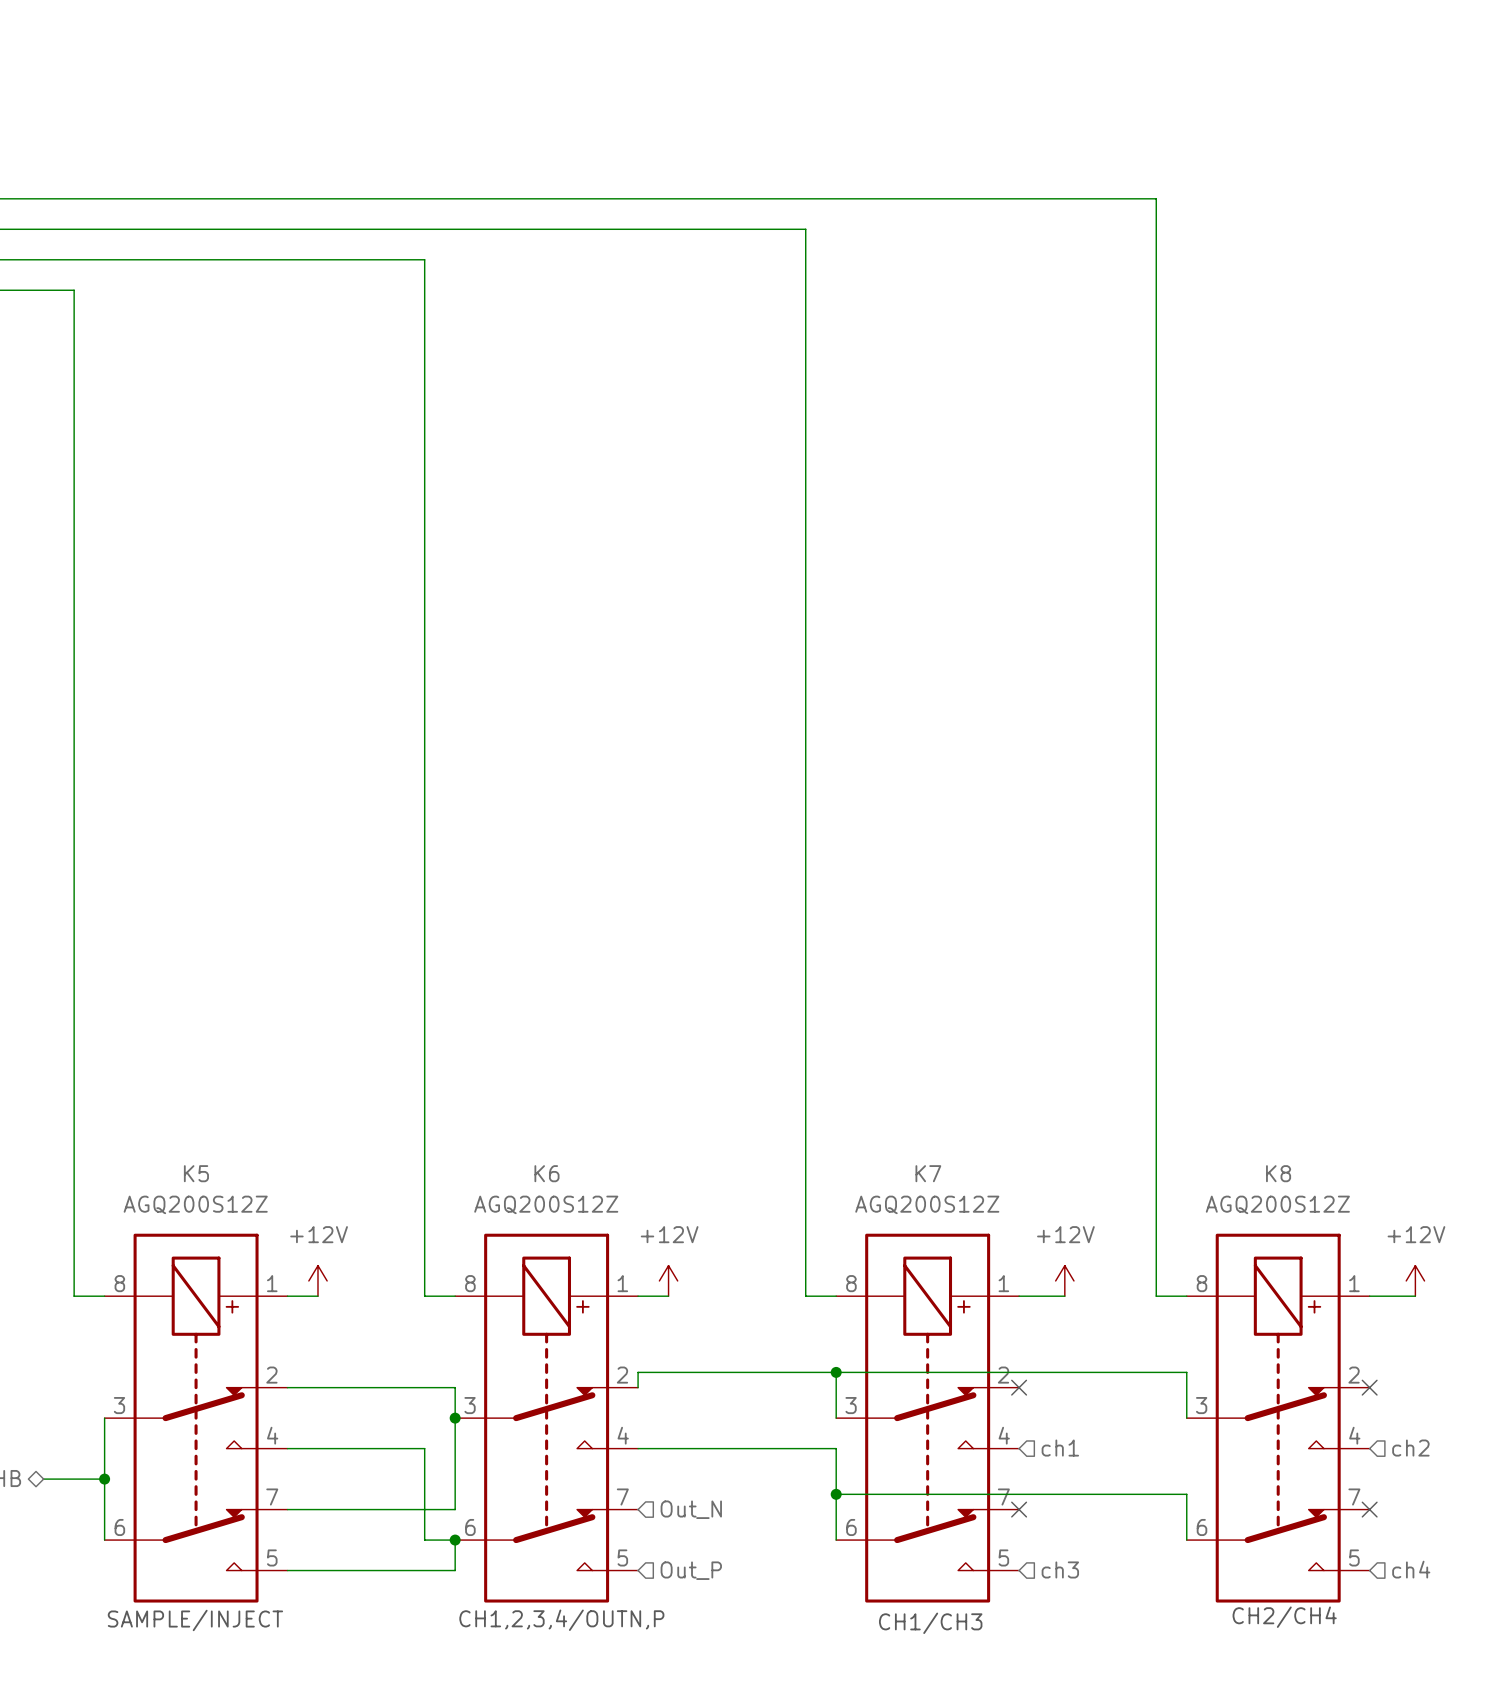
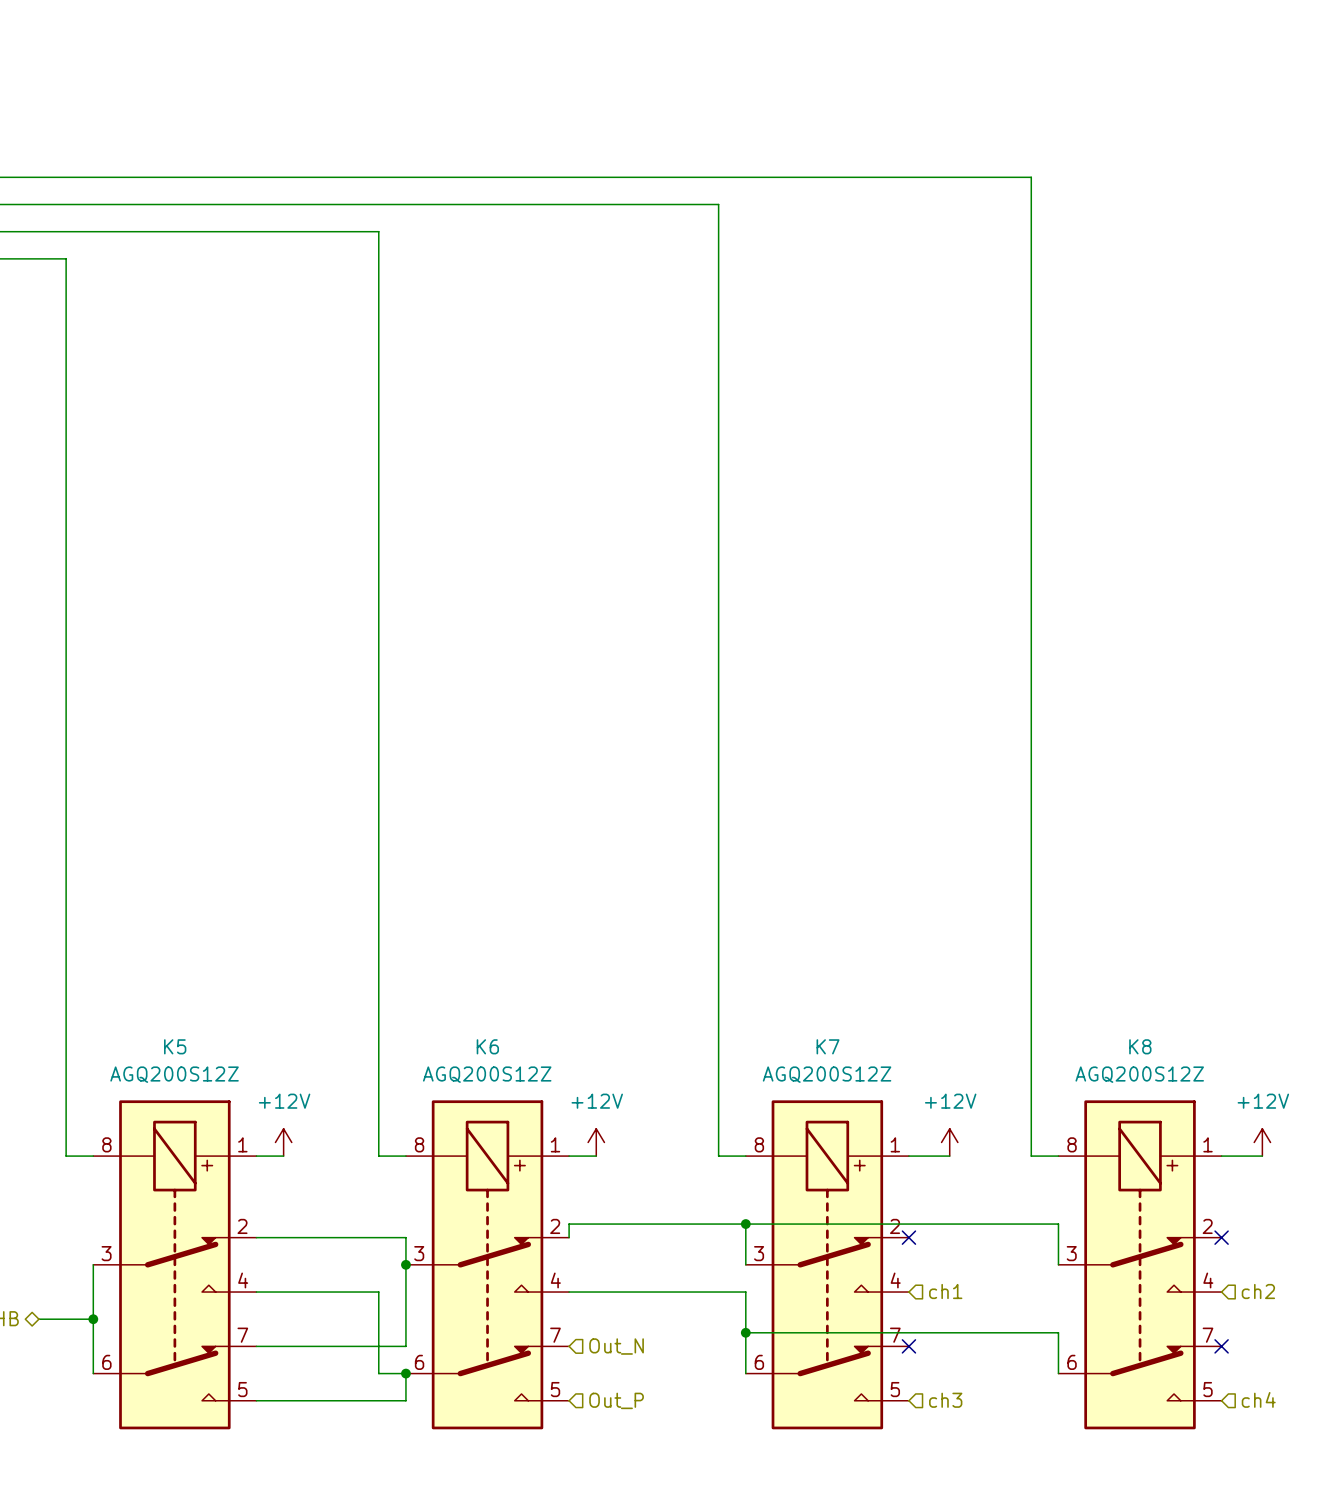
text: CH2/CH4 (1284, 1617) -> none
text: SAMPLE/INJECT (195, 1620) -> none
text: CH1,2,3,4/OUTN,P (561, 1620) -> none
text: CH1/CH3 (930, 1623) -> none

